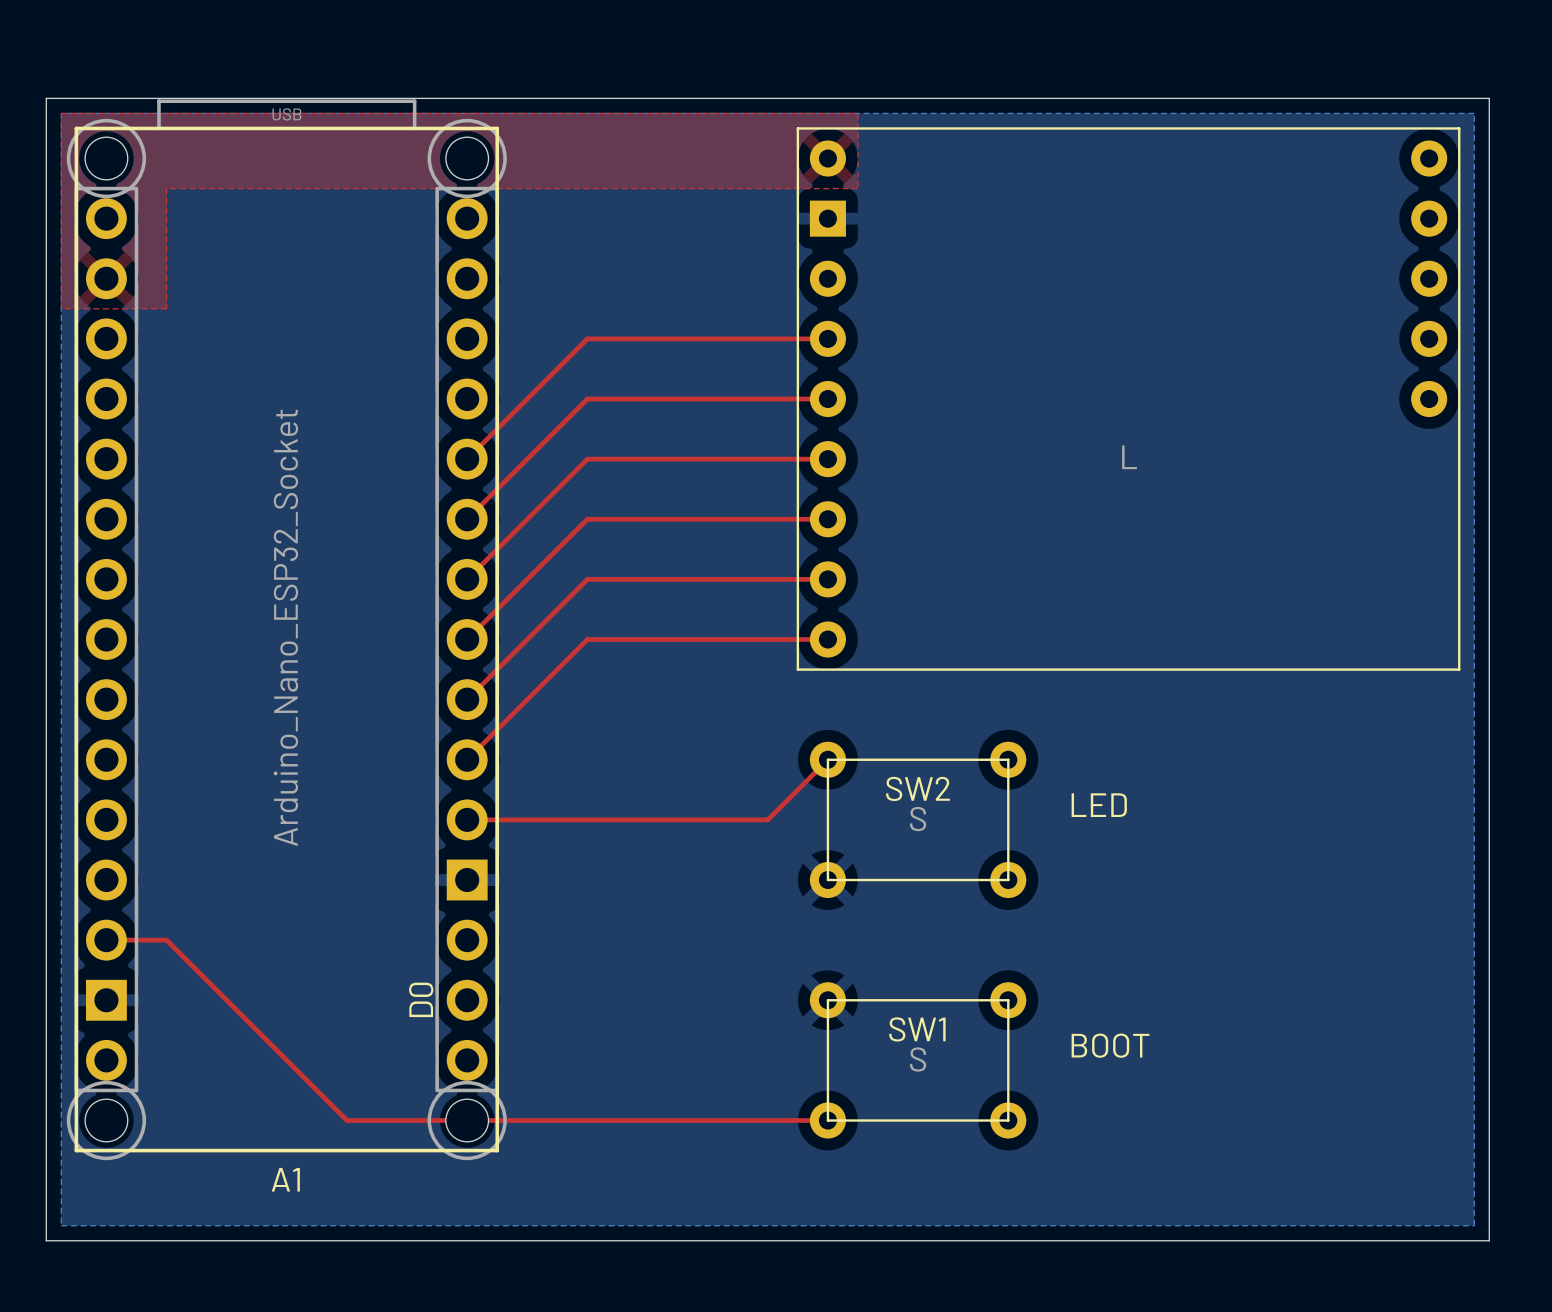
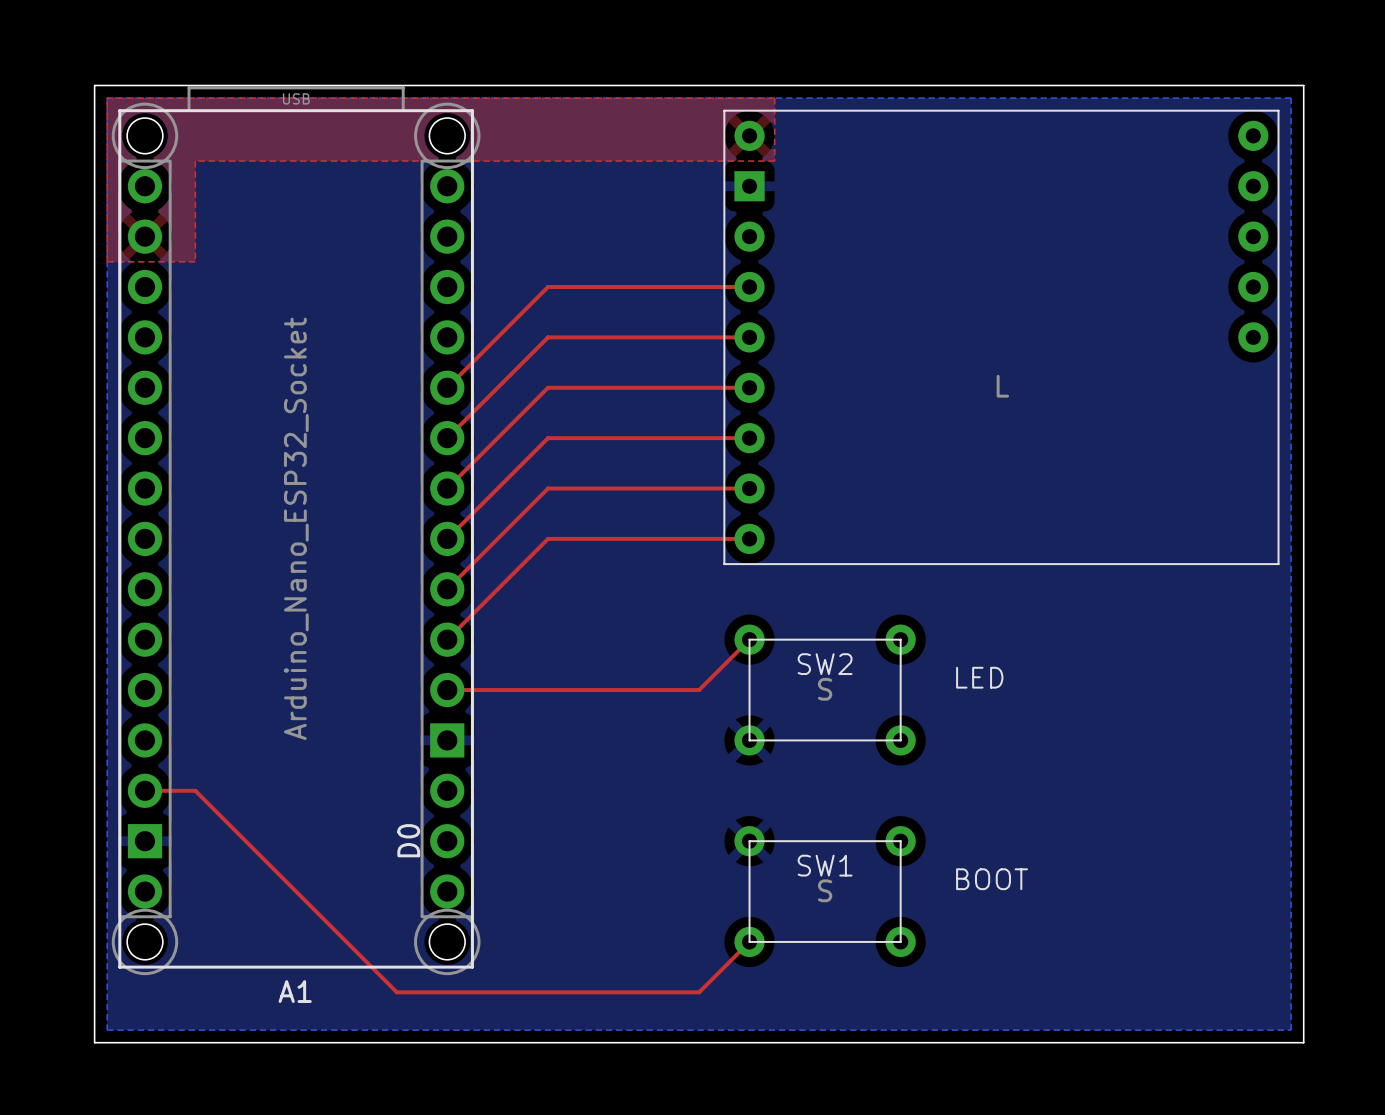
top track: (346, 1120) (827, 1120) -> (346, 941) (396, 992) (699, 992) (749, 941)

